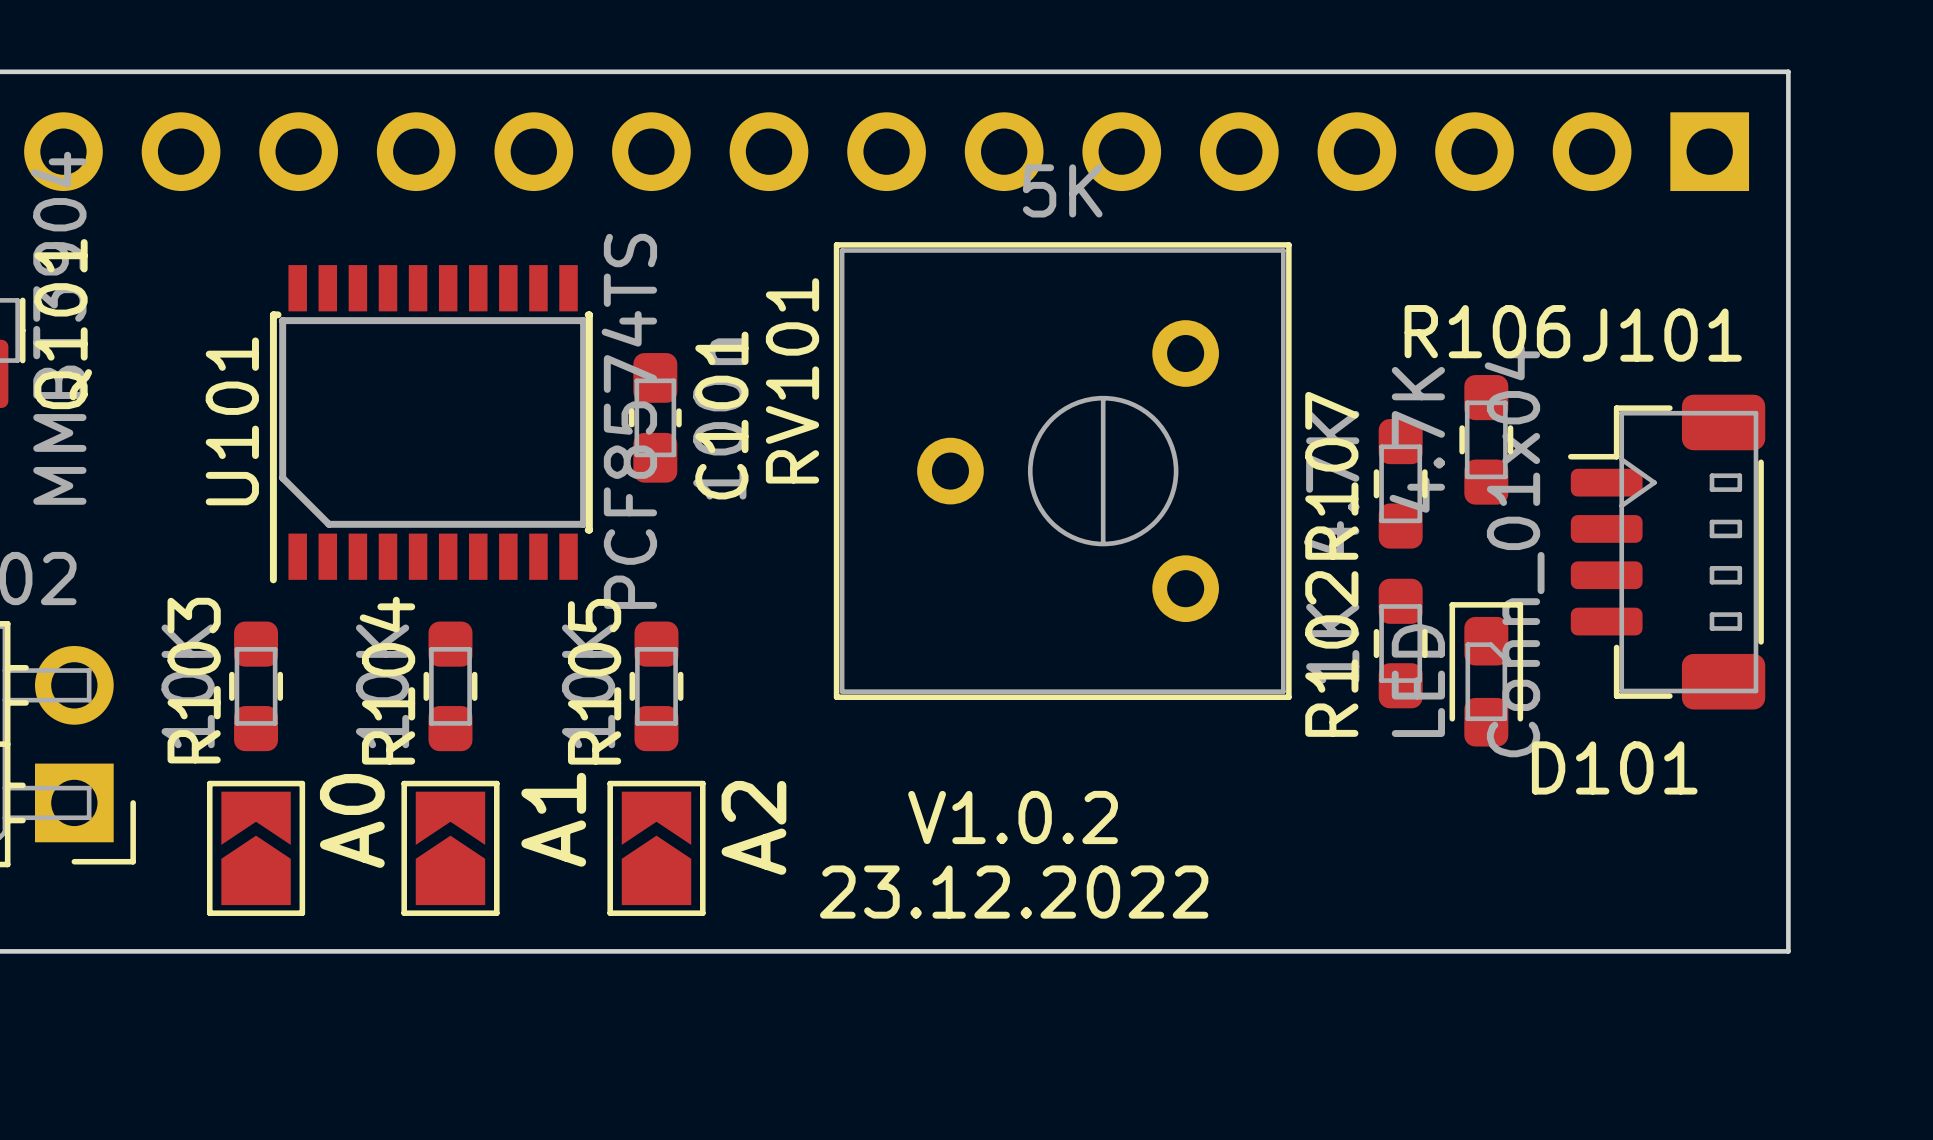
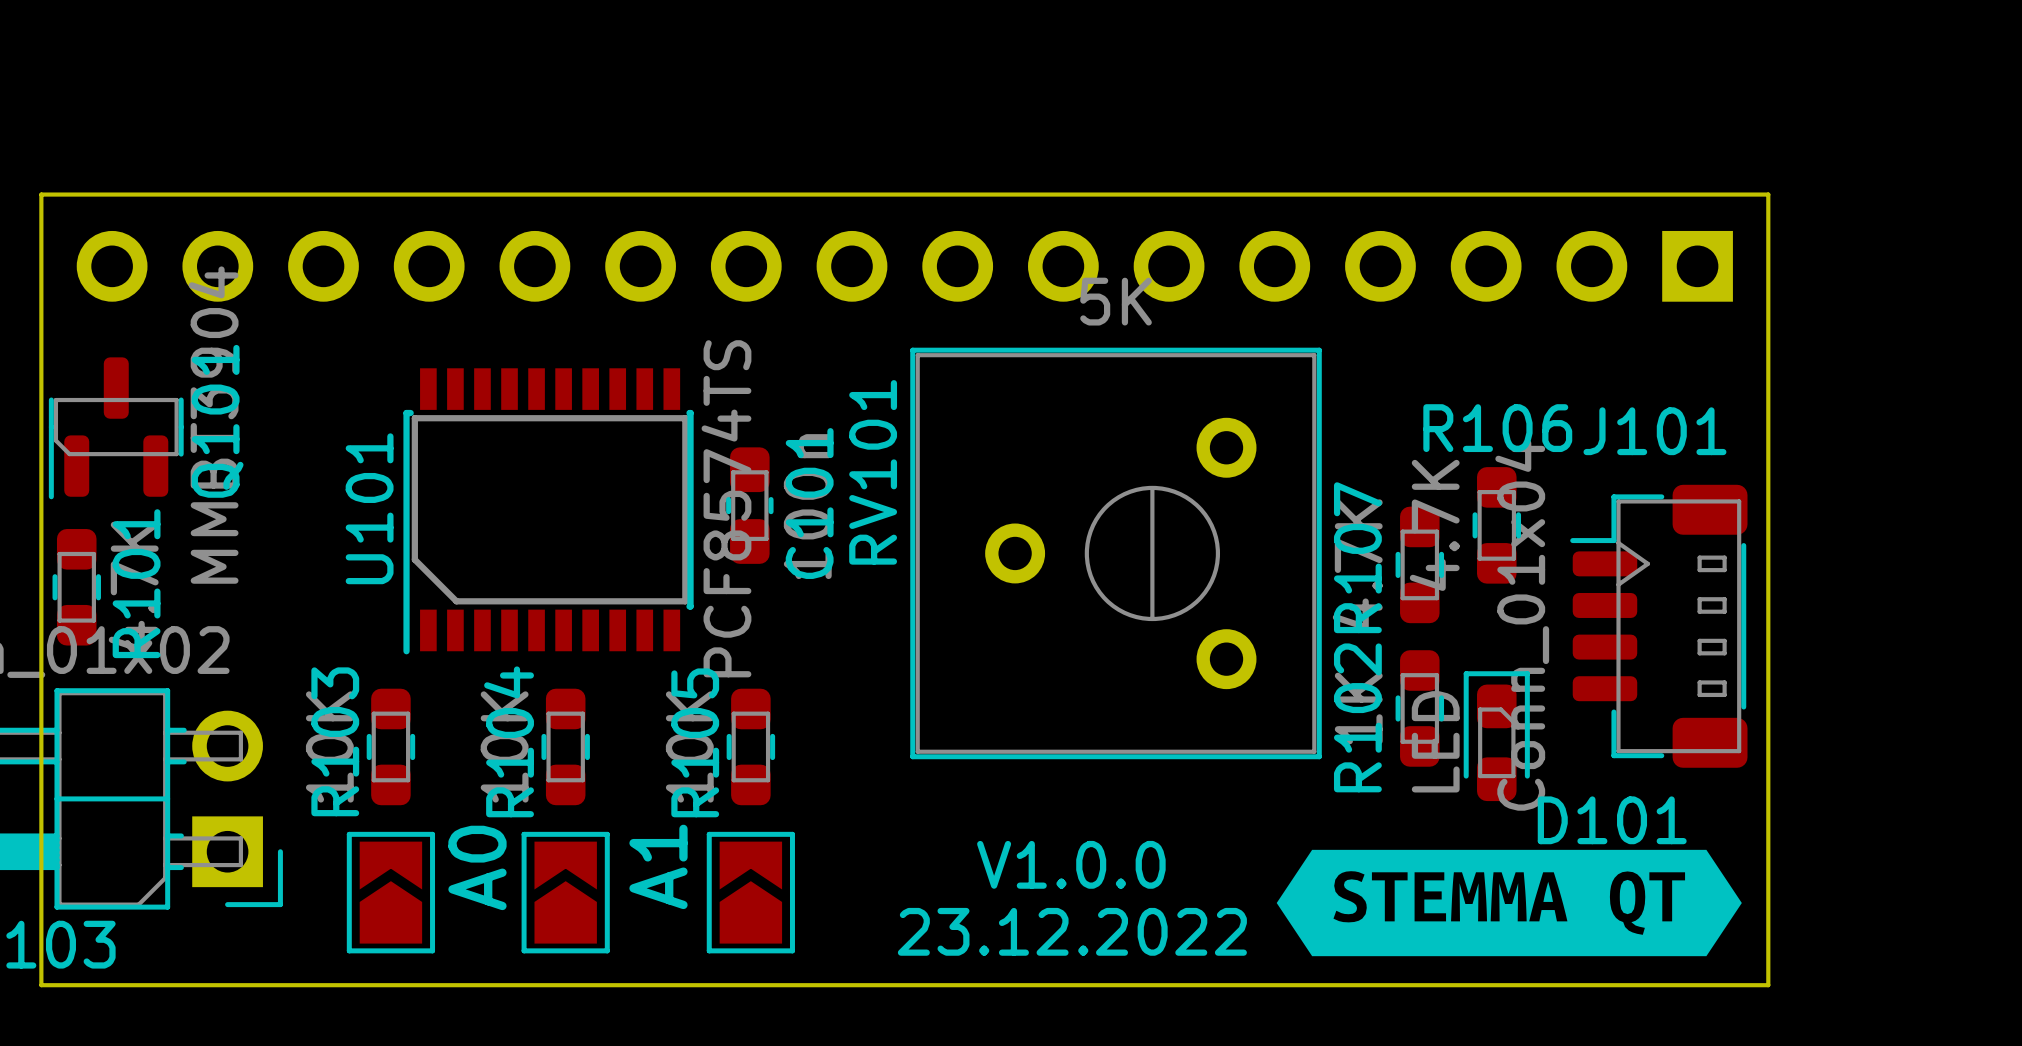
drawing: none -> [1276, 849, 1742, 957]
text: V1.0.2 (1013, 817) -> V1.0.0 (1071, 864)
text: A2 (753, 827) -> none

